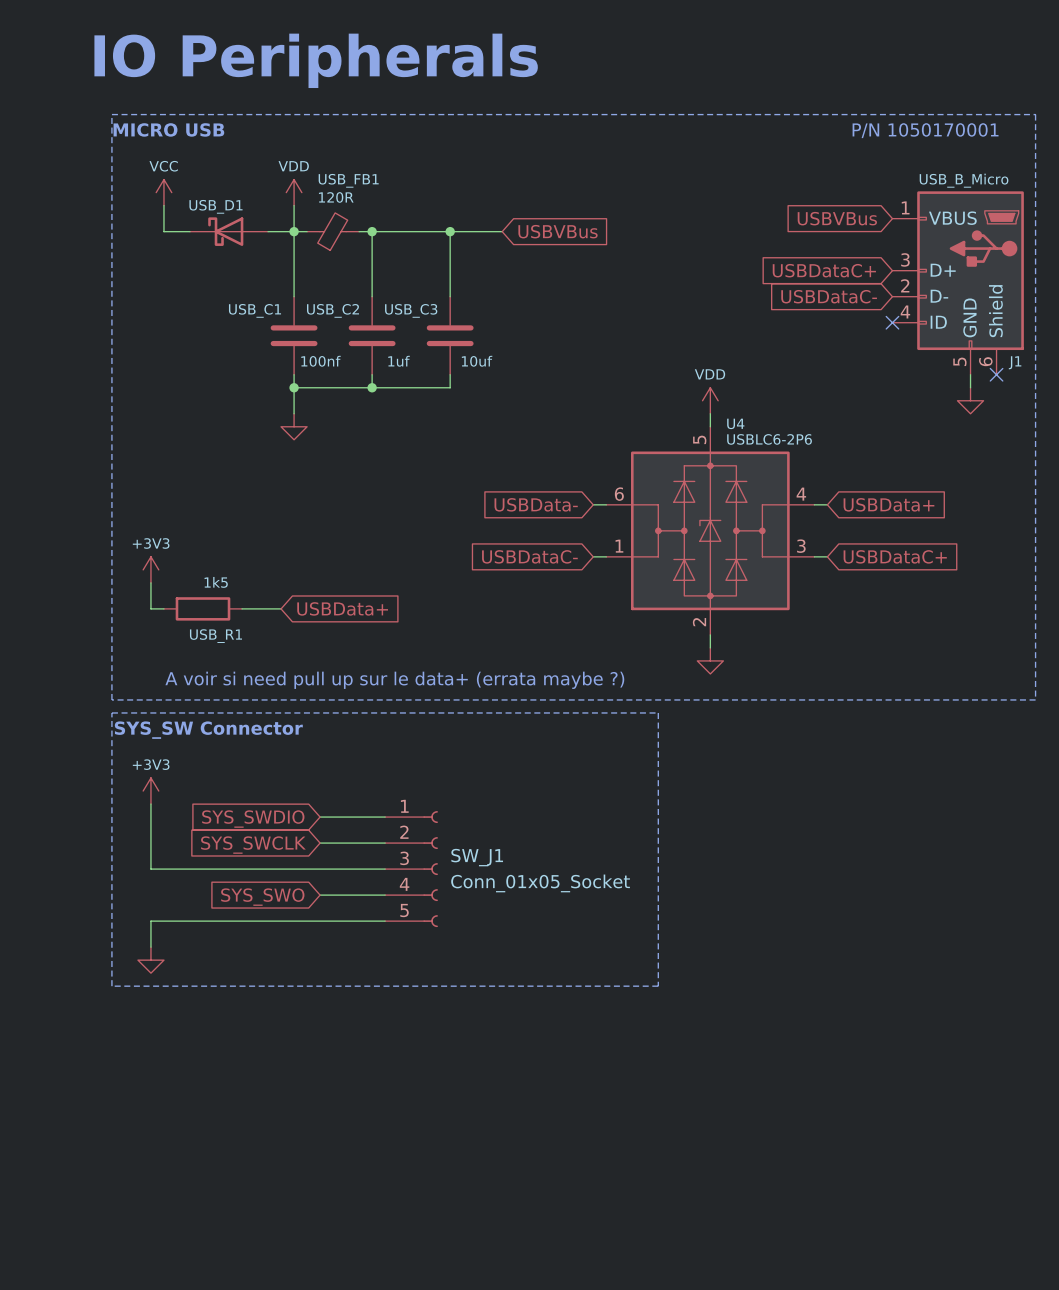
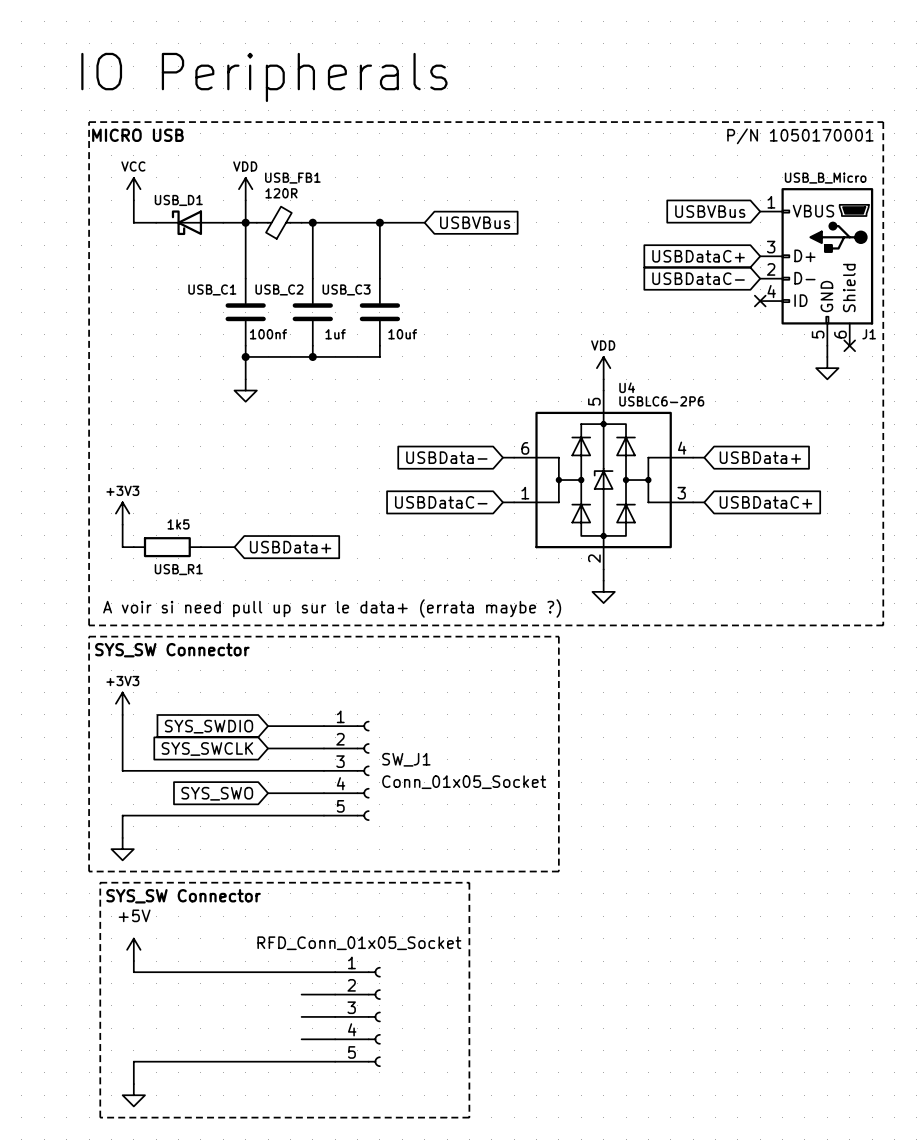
line: none -> (100, 882) (469, 882) (469, 1117) (100, 1117) (100, 882)
text: none -> SYS_SW Connector (183, 896)
power symbol: none -> +5V (133, 949)
wire: none -> (133, 961) (133, 972) (335, 972)
wire: none -> (301, 994) (335, 994)
wire: none -> (301, 1016) (335, 1016)
part: none -> RFD_Conn_01x05_Socket (357, 1016)
wire: none -> (301, 1039) (335, 1039)
wire: none -> (335, 1061) (133, 1061) (133, 1084)
power symbol: none -> (133, 1095)

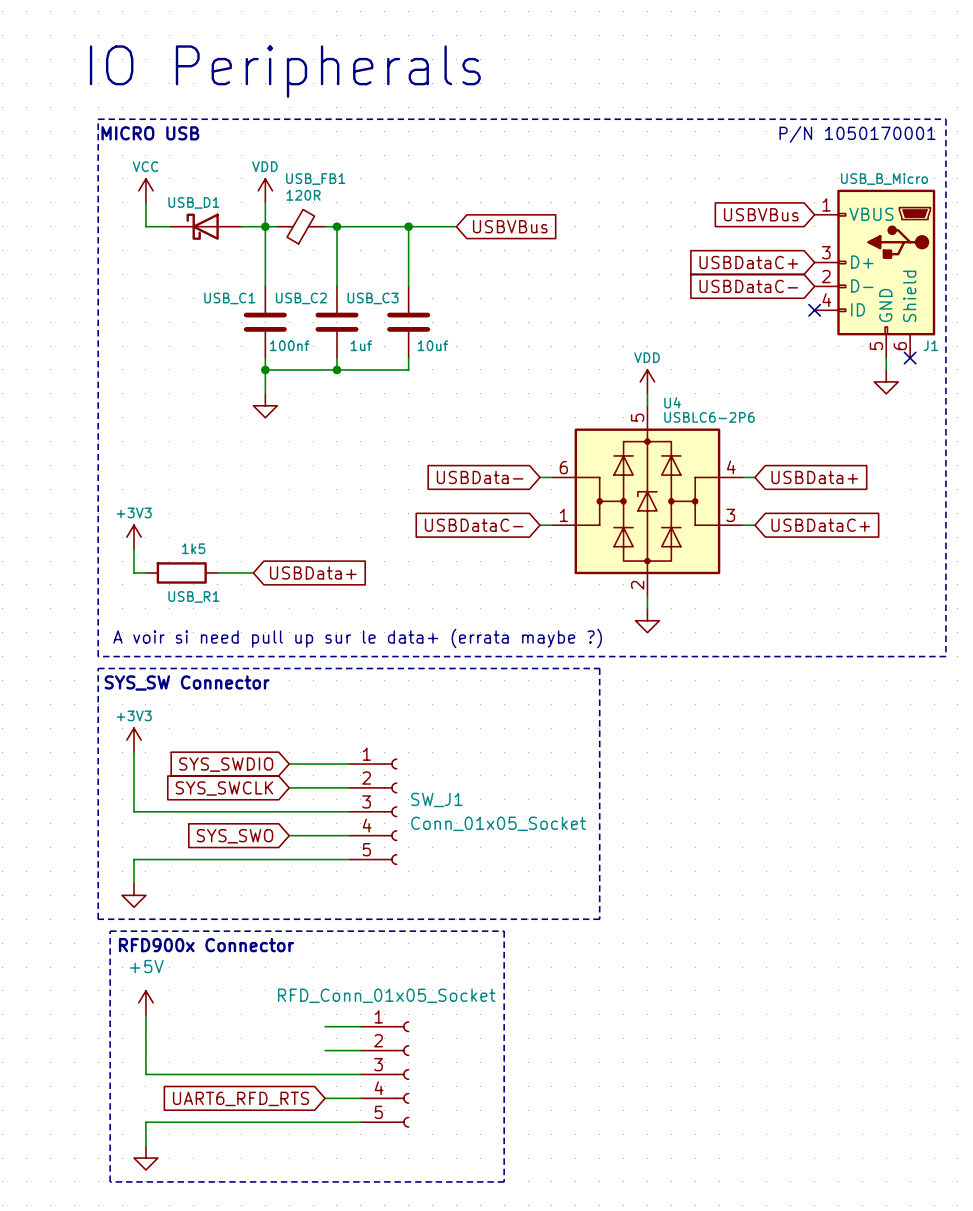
text: SYS_SW Connector (183, 896) -> RFD900x Connector (206, 945)
wire: (133, 972) (301, 972) -> (145, 1026) (145, 1074) (325, 1074)
global label: none -> UART6_RFD_RTS (241, 1098)

